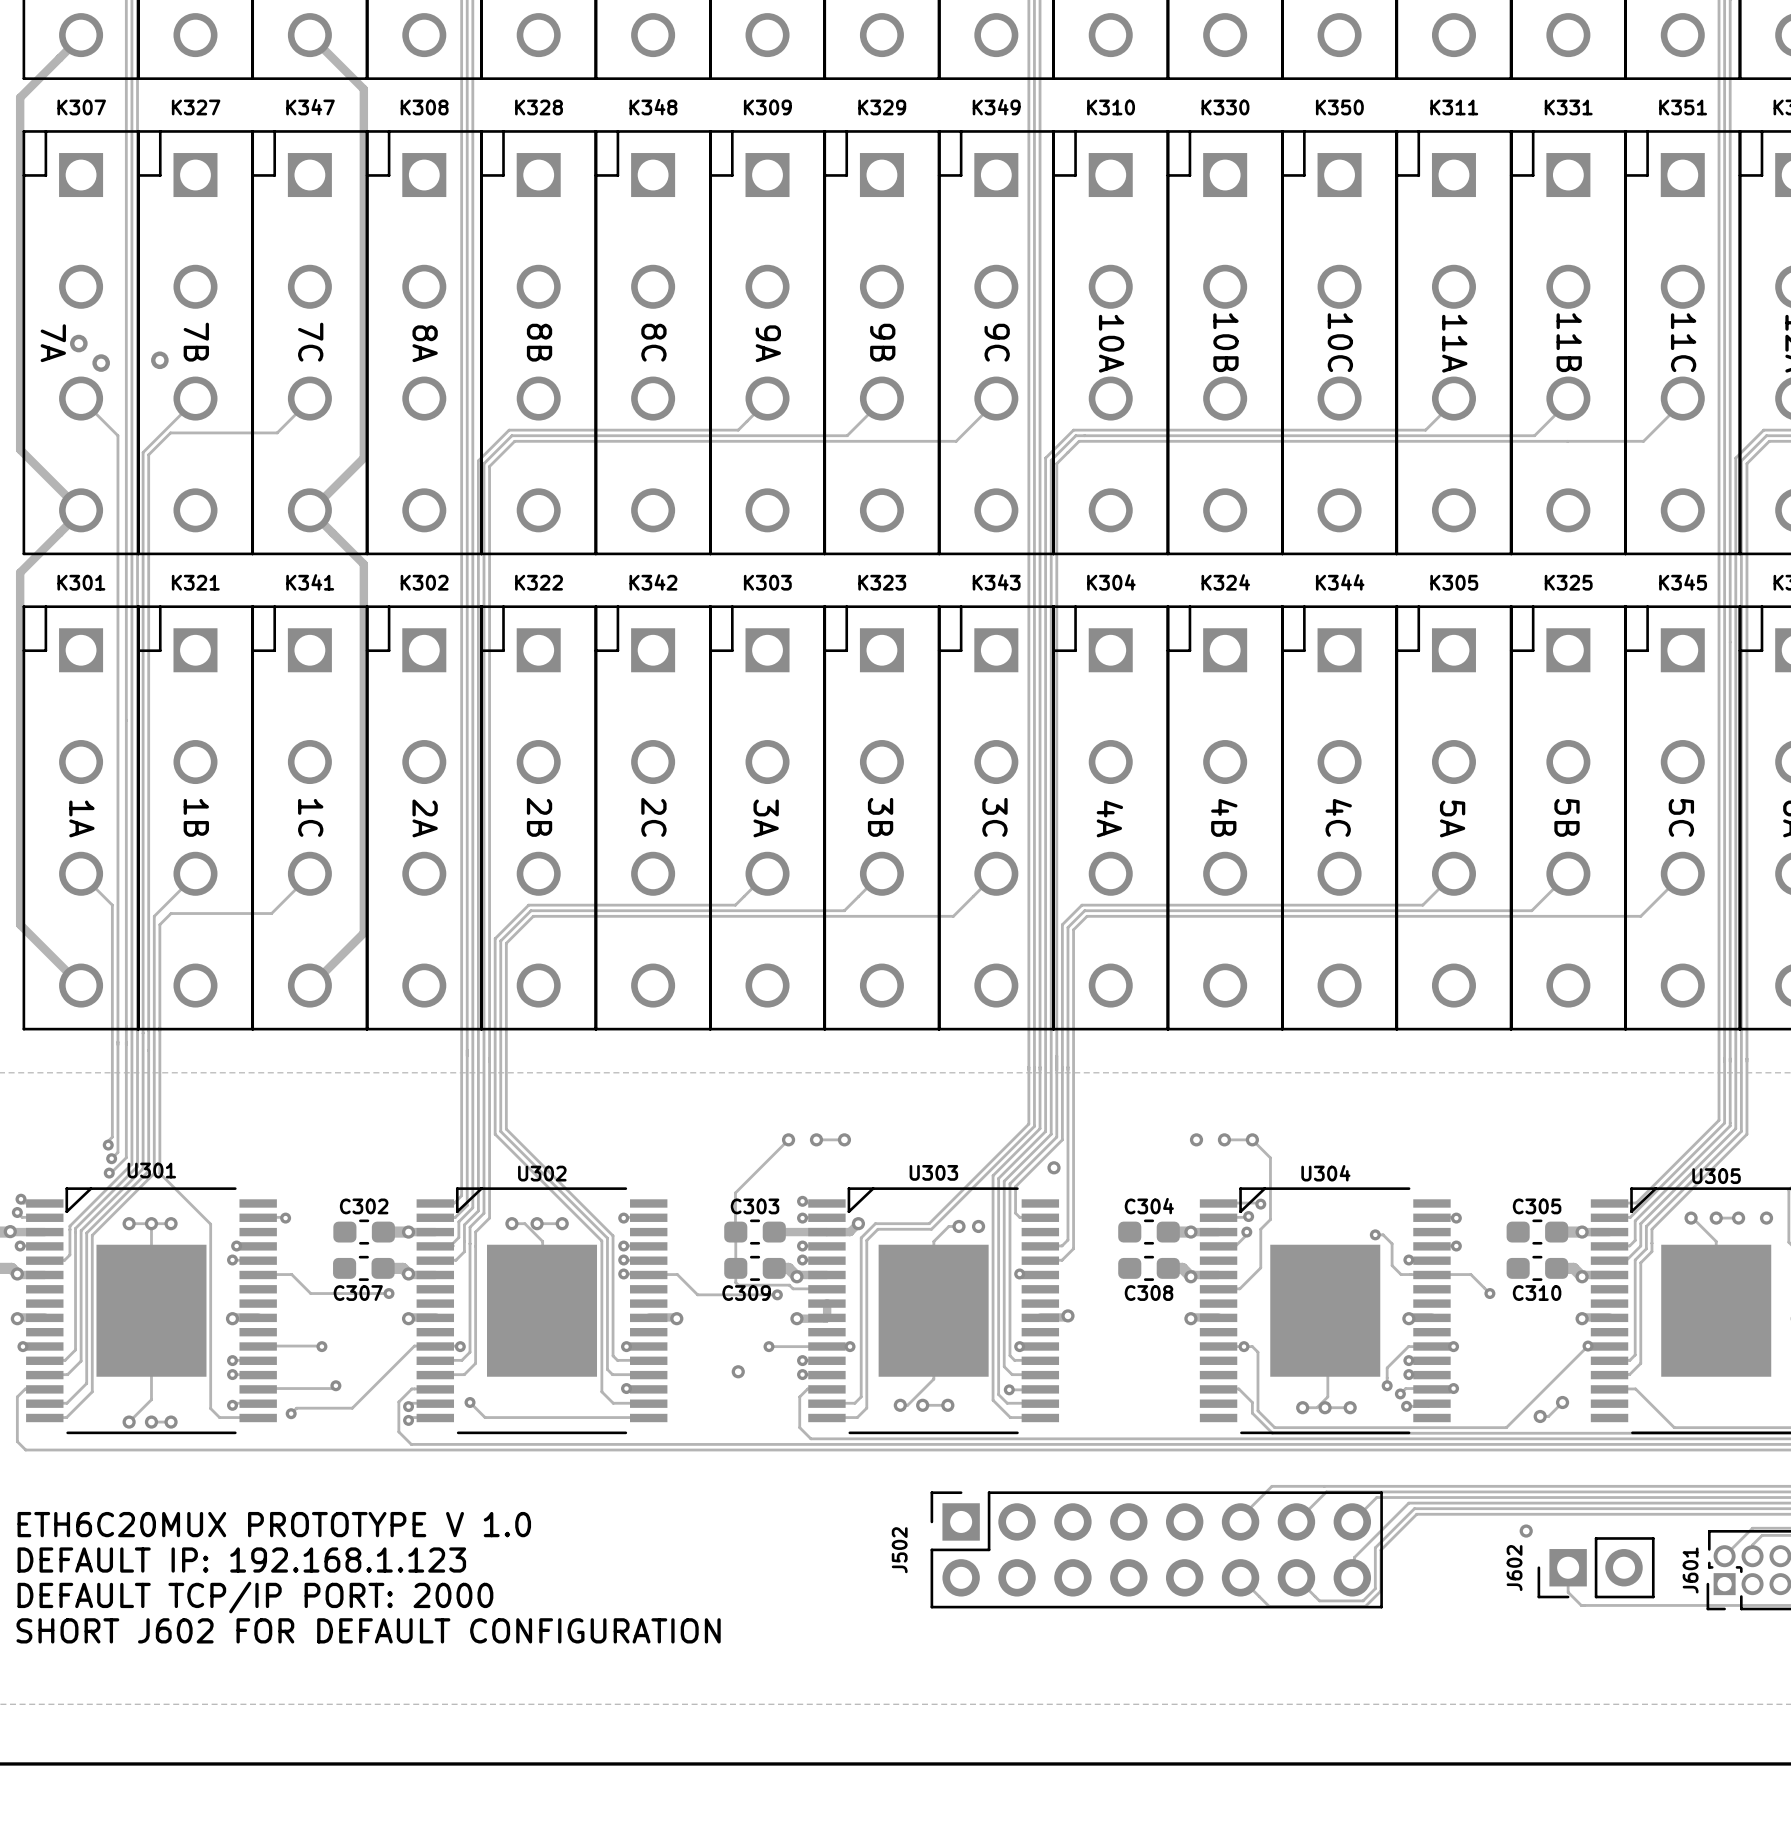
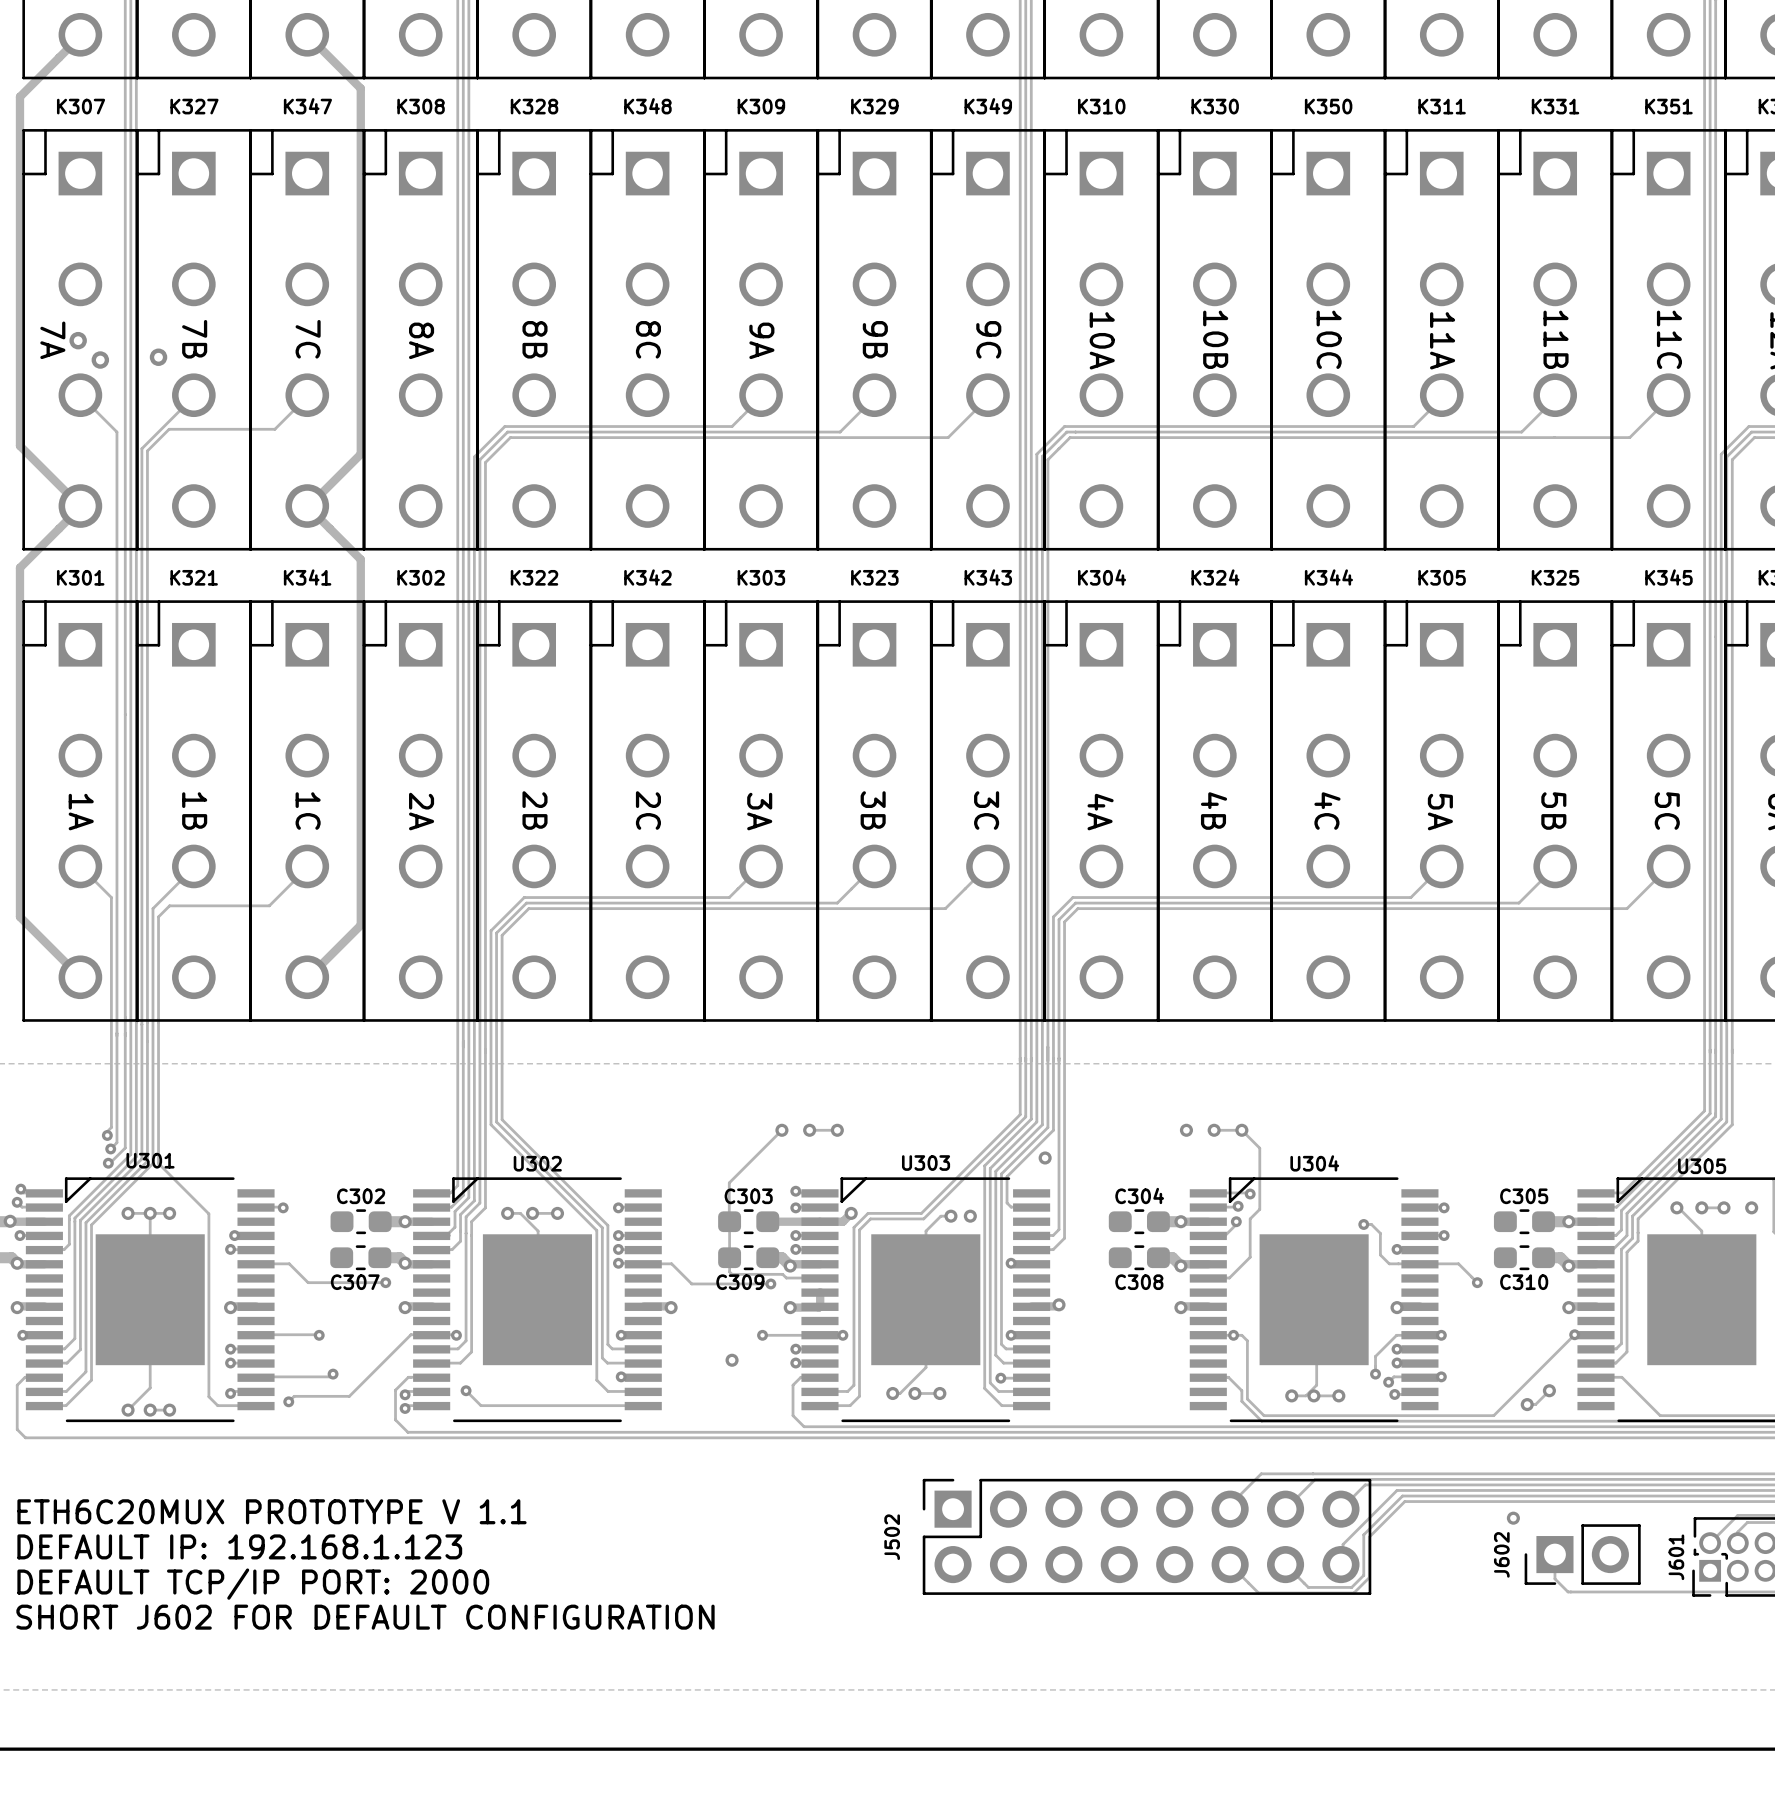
text: ETH6C20MUX PROTOTYPE V 1.0 (274, 1524) -> ETH6C20MUX PROTOTYPE V 1.1 (271, 1511)

